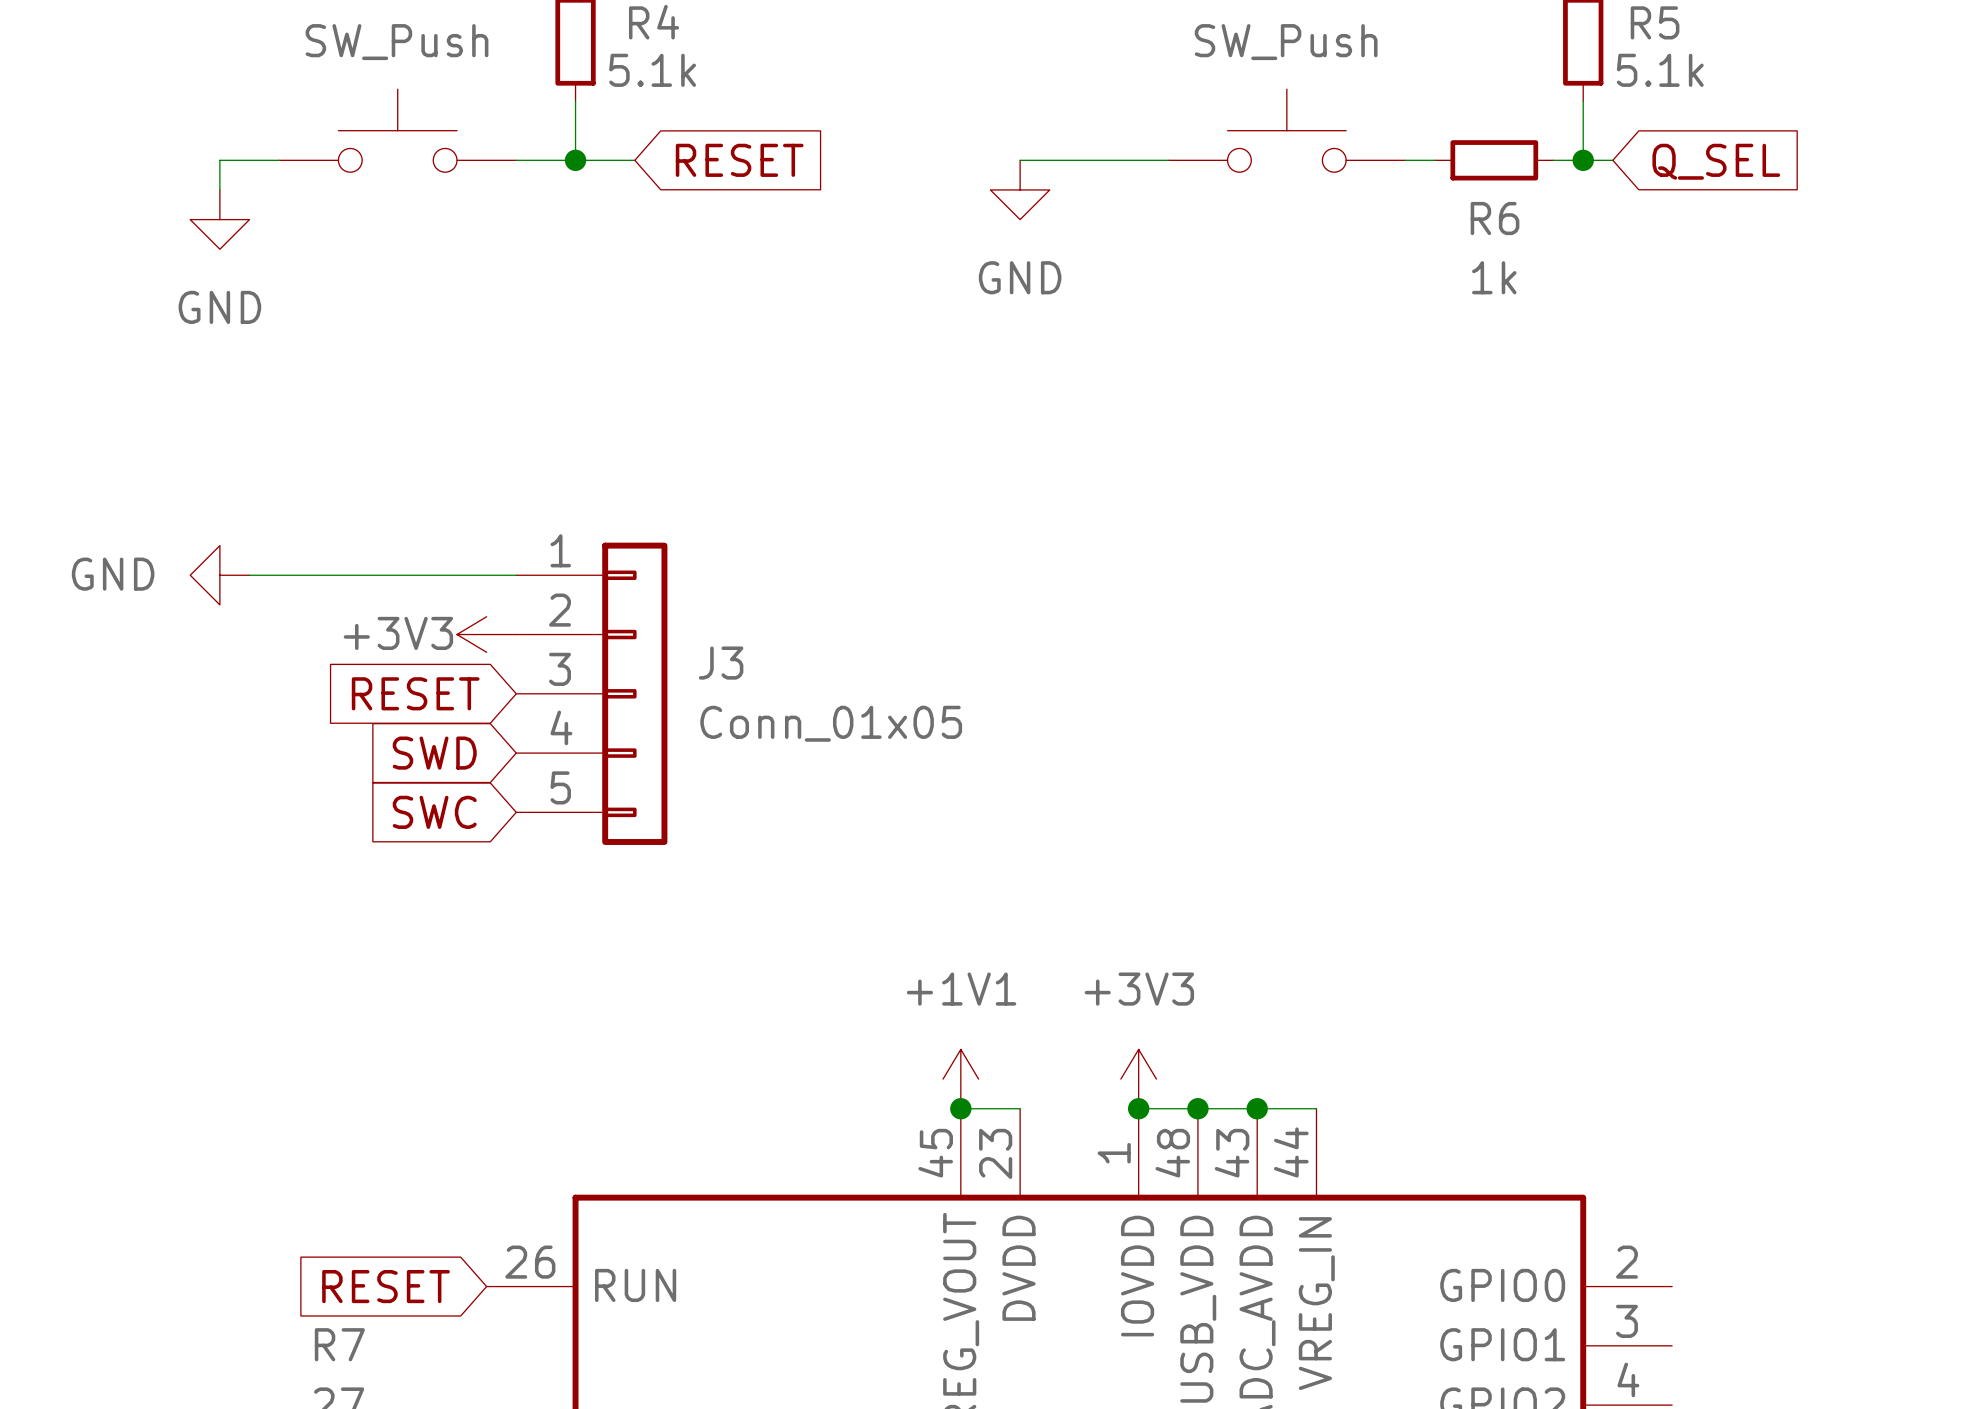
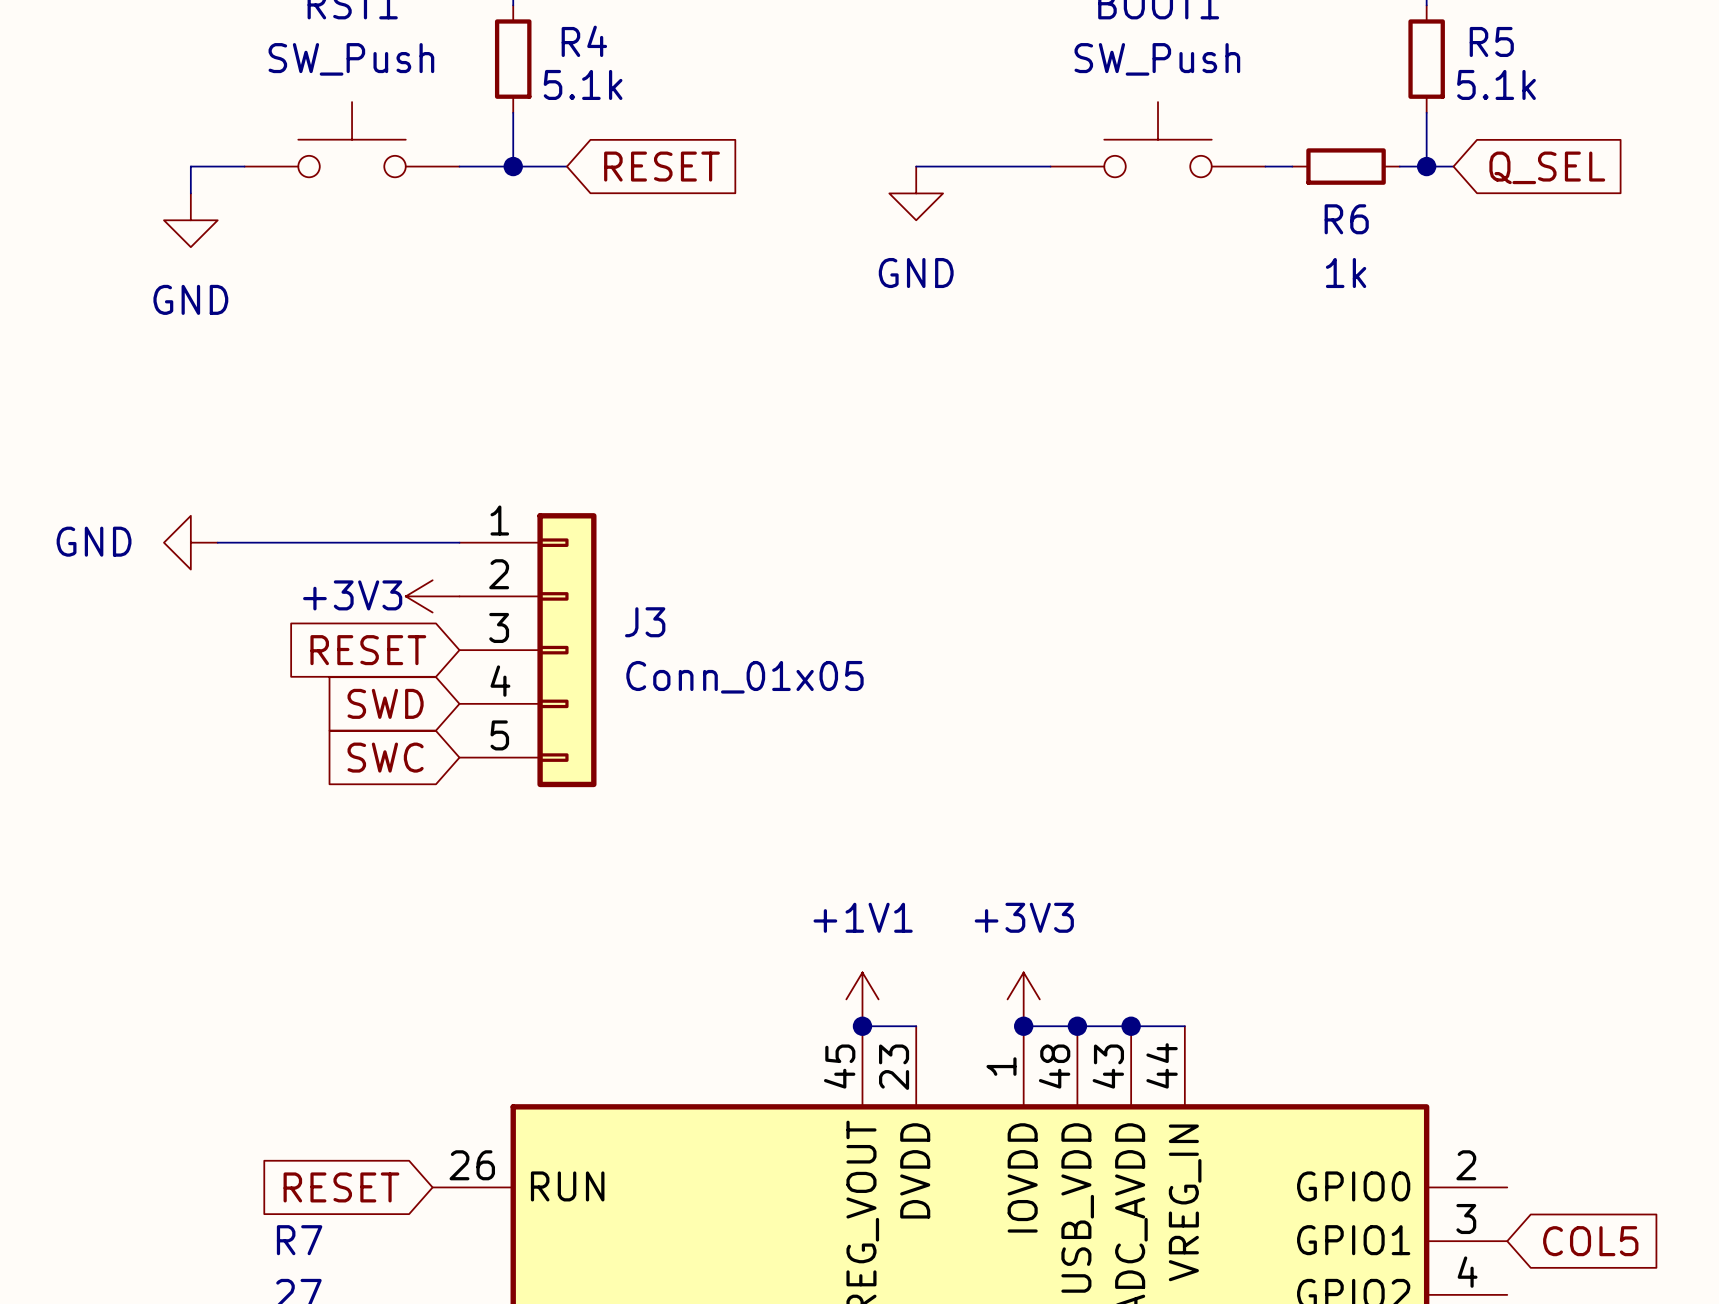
global label: none -> COL5 (1590, 1241)

